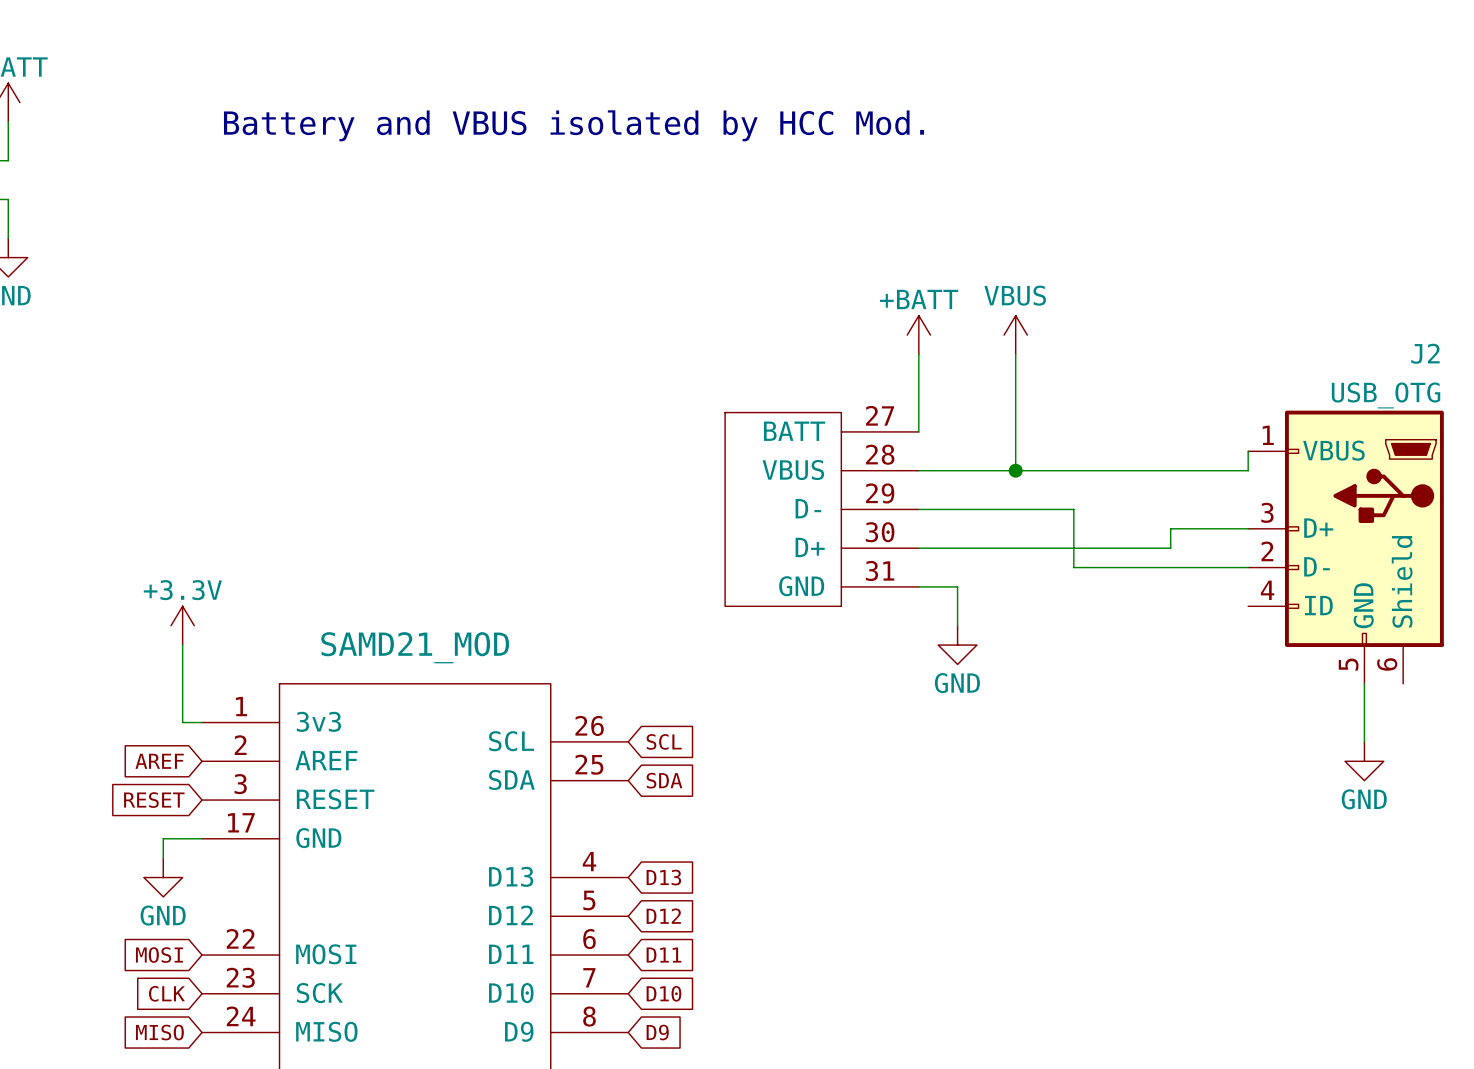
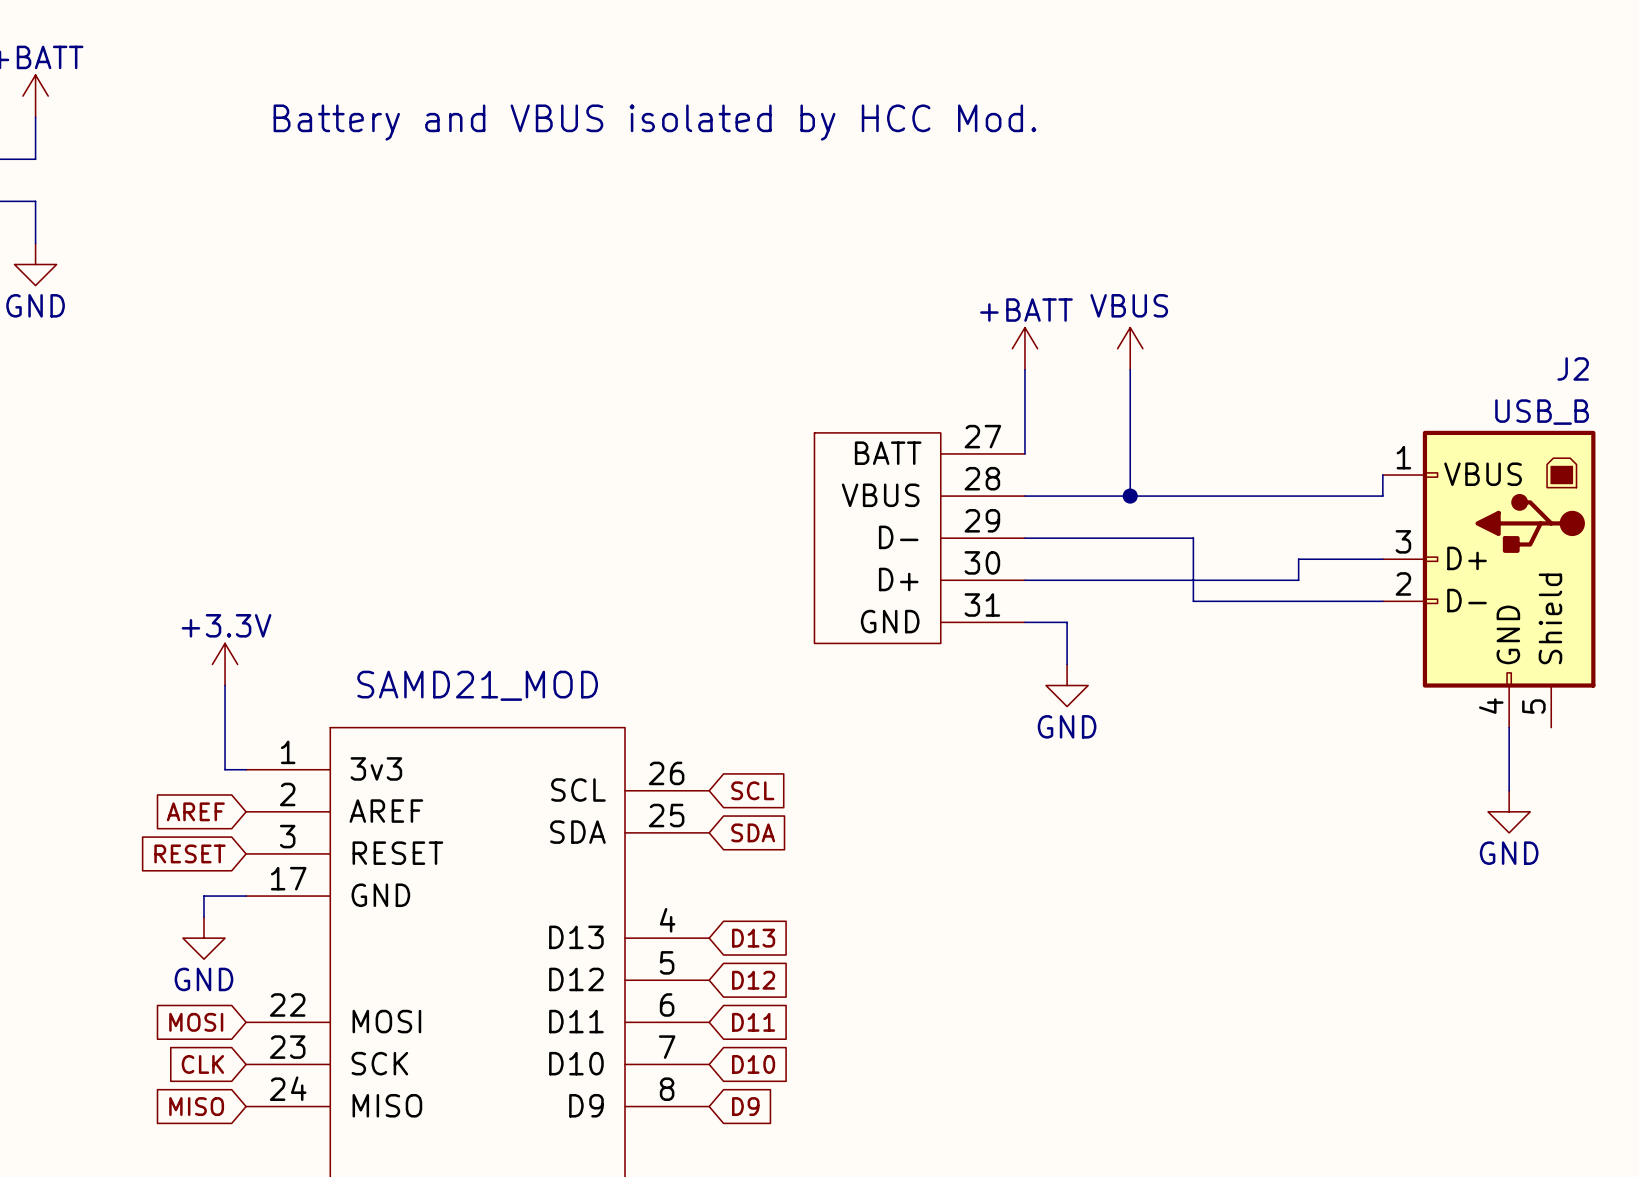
J2 value: USB_OTG (1386, 395) -> USB_B (1542, 412)
J2 symbol: [1248, 410, 1444, 684] -> [1382, 430, 1596, 728]

